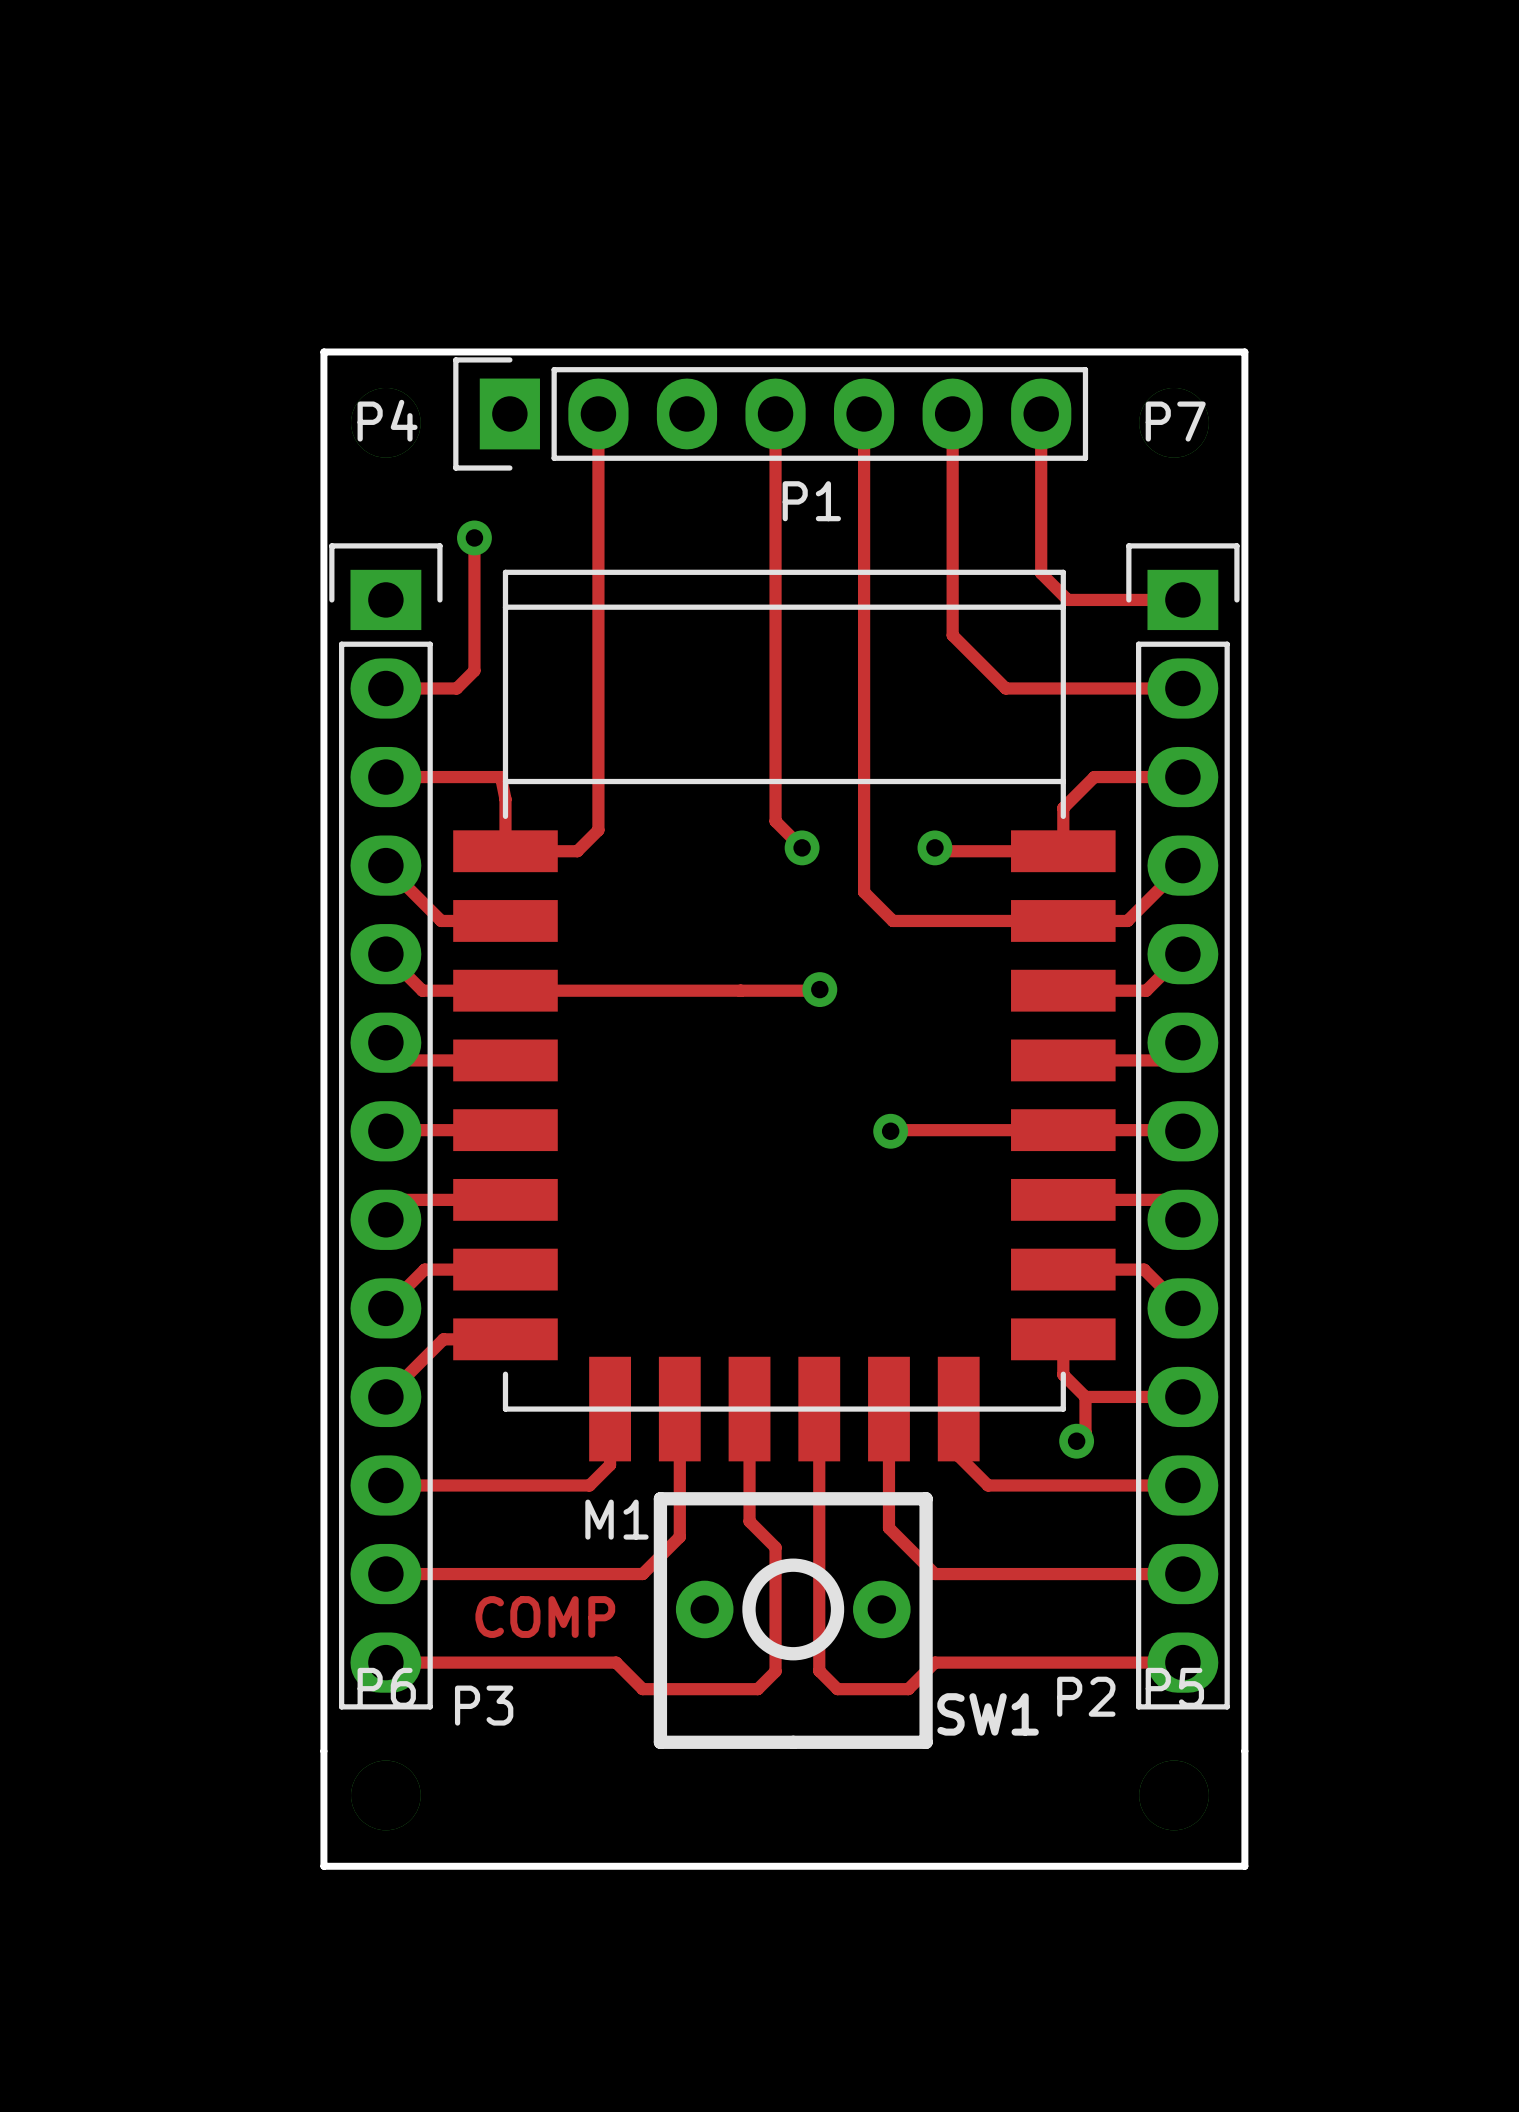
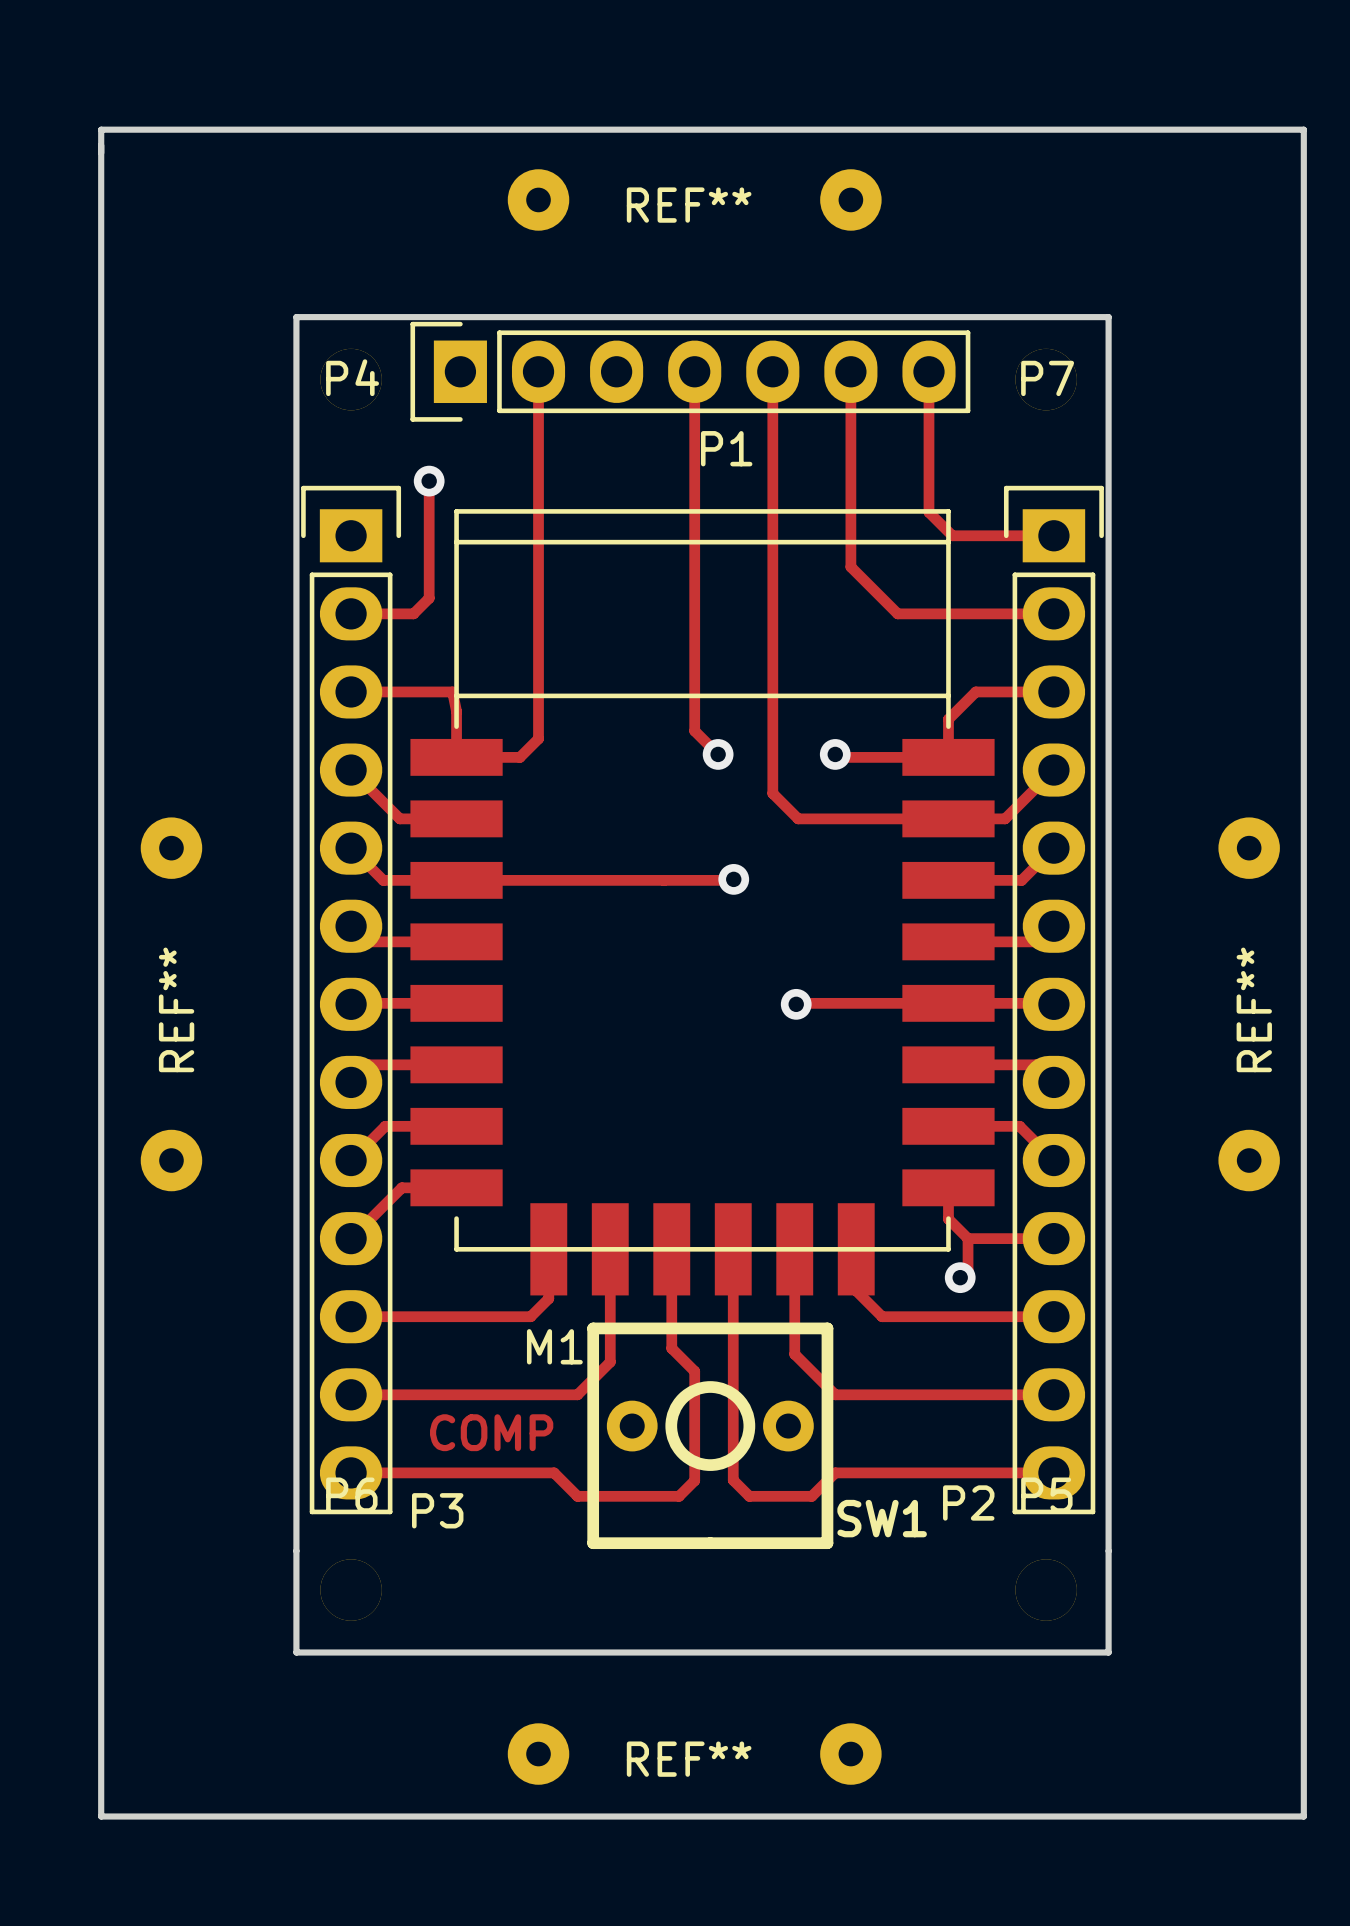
board edge: none -> (101, 129) (101, 1816) (1303, 1816) (1303, 129) (101, 129)
REF**: none -> (694, 199)
REF**: none -> (171, 1004)
REF**: none -> (1249, 1004)
REF**: none -> (694, 1754)

